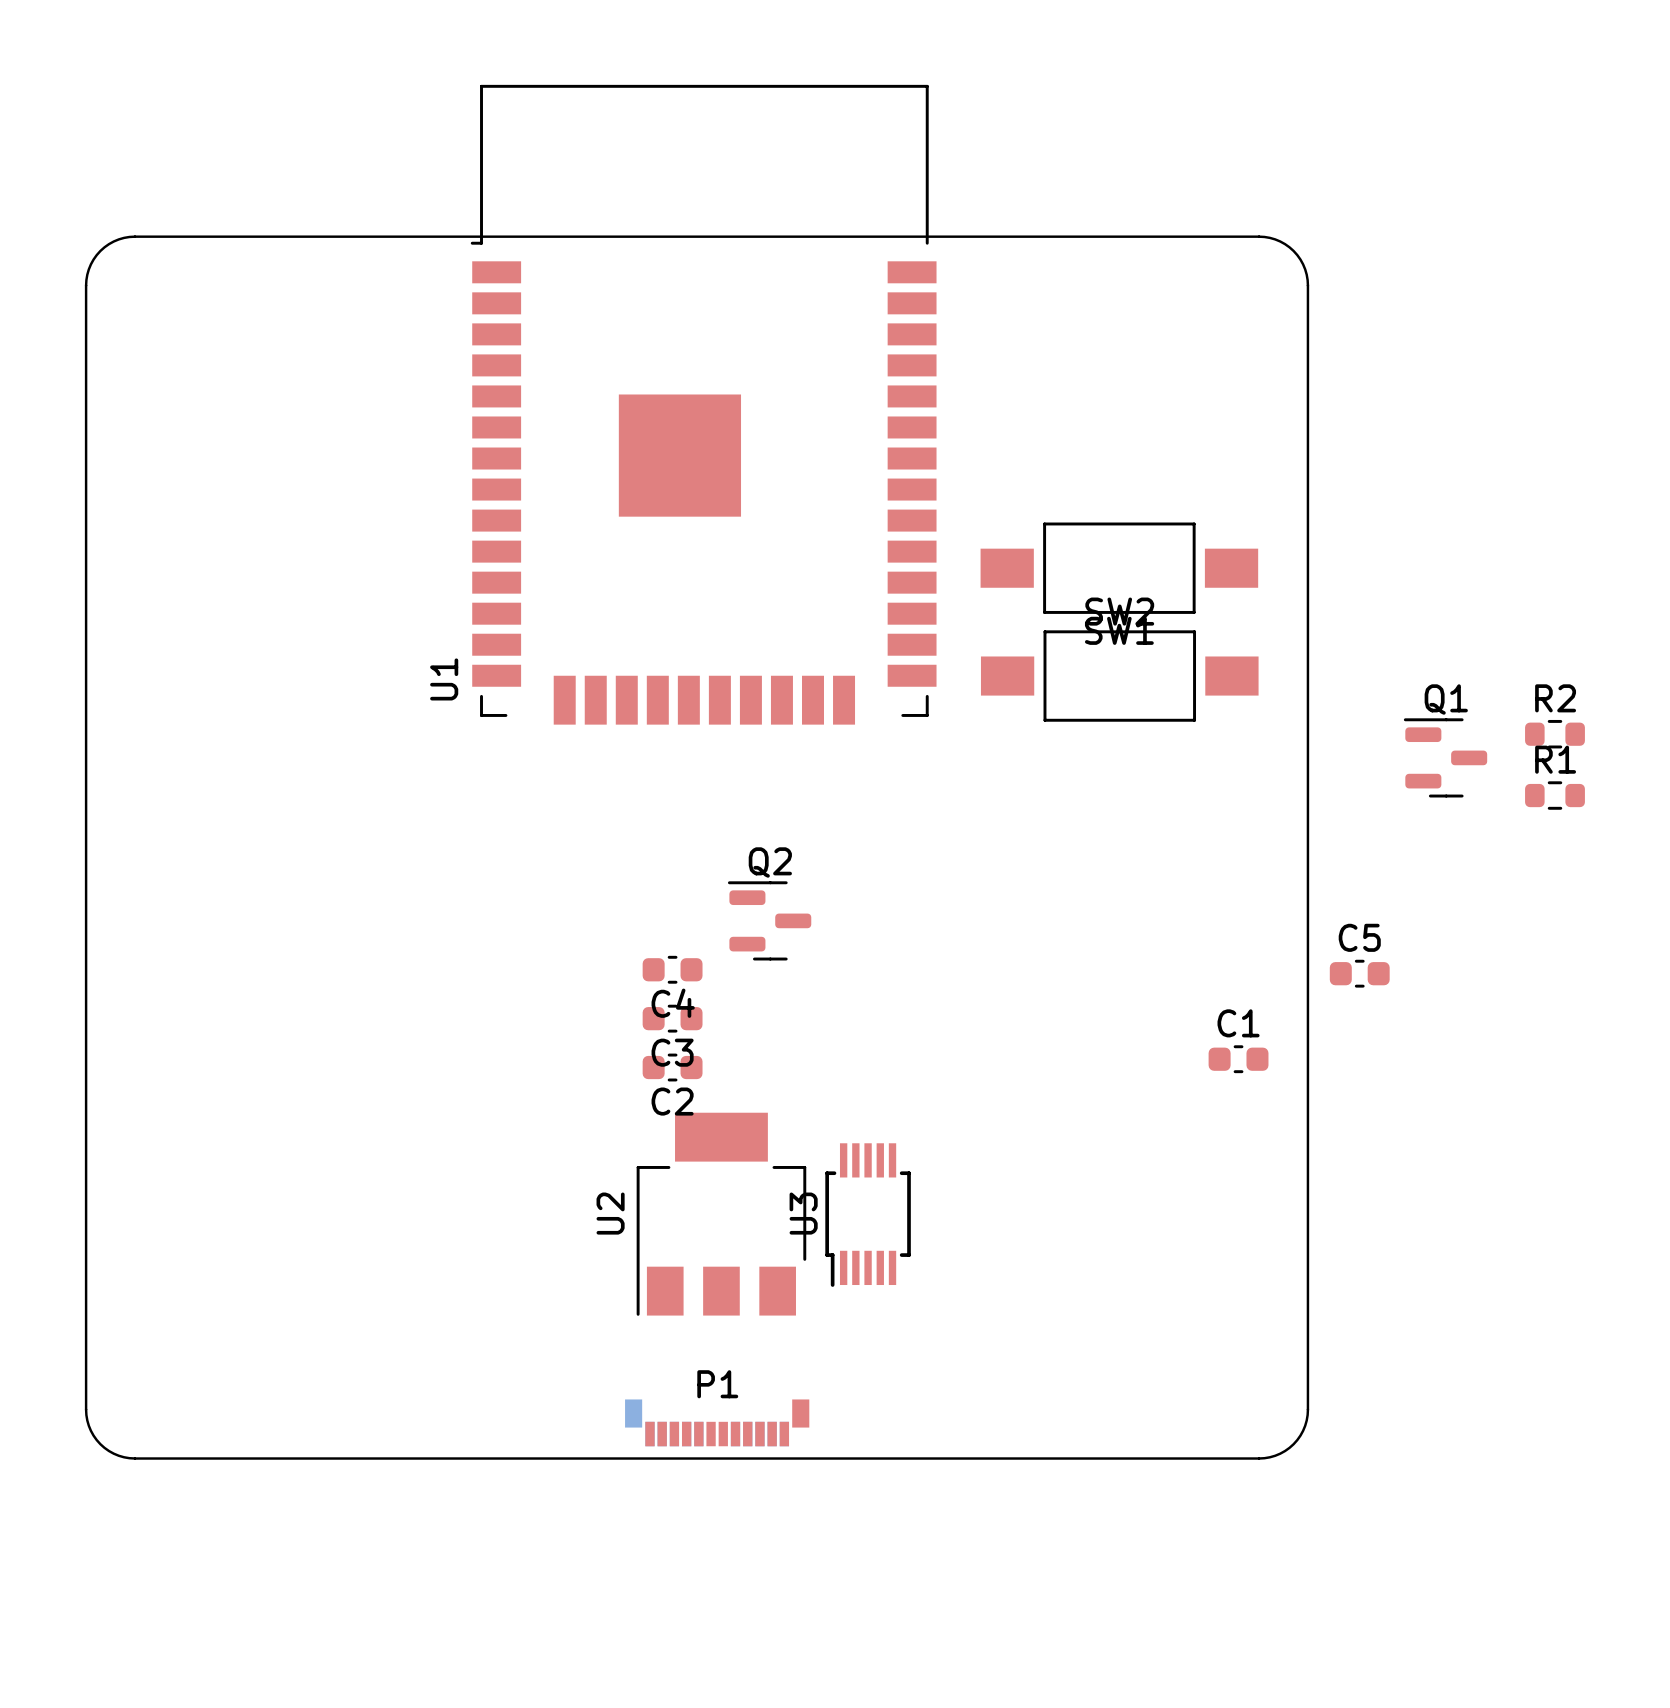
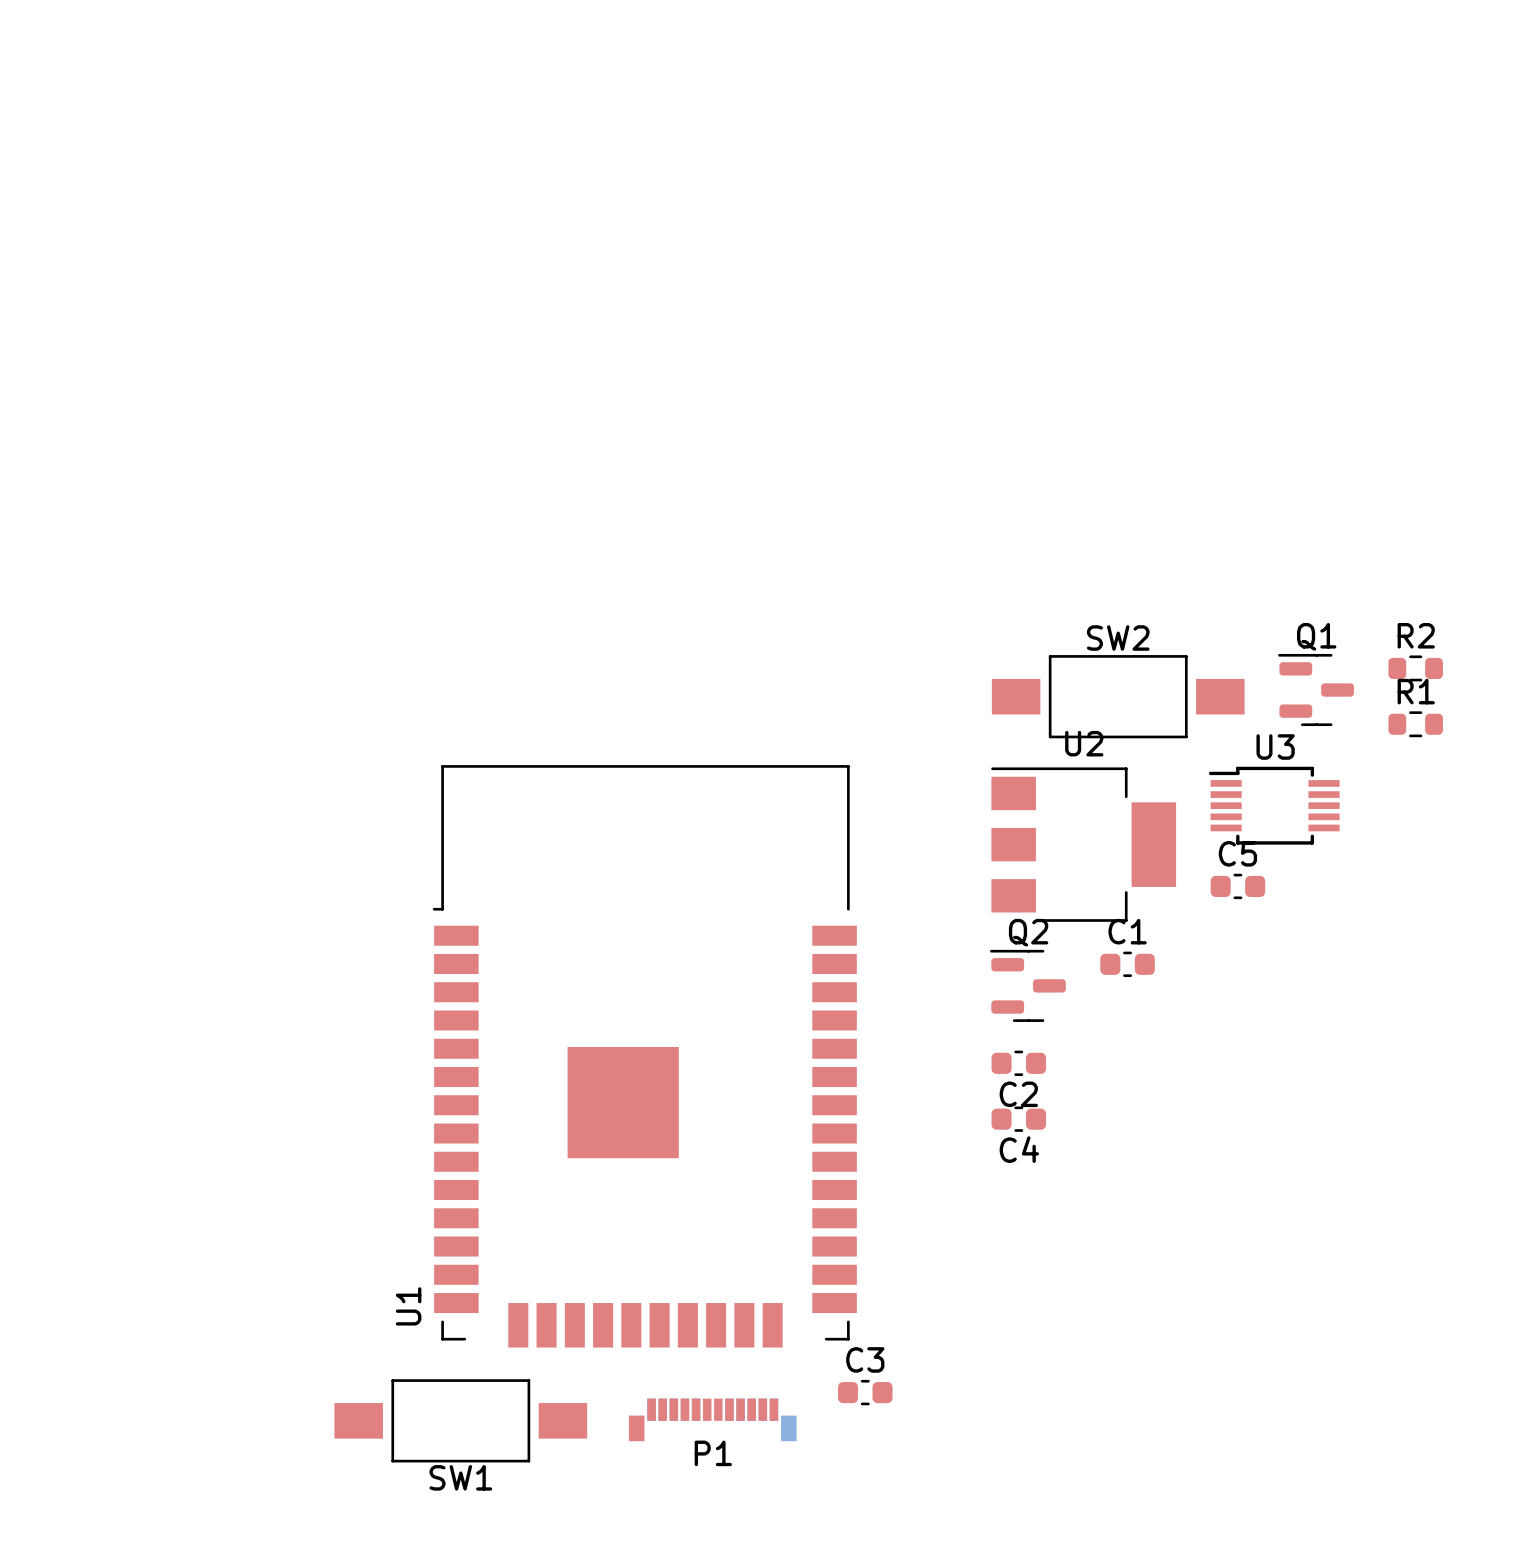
board edge: (134, 236) (1259, 236) (1280, 241) (1293, 250) (1303, 264) (1307, 285) (1307, 1409) (1305, 1425) (1293, 1444) (1275, 1455) (1259, 1458) (134, 1458) (118, 1455) (100, 1444) (88, 1425) (86, 1409) (86, 285) (90, 264) (100, 250) (113, 241) (134, 236) -> none
U1 position: (703, 404) -> (644, 1056)
SW1 position: (1119, 568) -> (460, 1420)
SW2 position: (1119, 676) -> (1118, 696)
Q2 position: (769, 920) -> (1027, 985)
C4 position: (672, 969) -> (1018, 1119)
C3 position: (672, 1018) -> (865, 1392)
C3 name position: C3 (672, 1052) -> C3 (865, 1359)
C2 position: (672, 1067) -> (1018, 1063)
U2 rotation: 0° (721, 1214) -> 90° clockwise (1083, 844)
U2 position: (721, 1214) -> (1083, 844)
U3 rotation: 0° (868, 1215) -> 90° clockwise (1274, 805)
U3 position: (868, 1215) -> (1274, 805)
P1 rotation: 0° (717, 1422) -> 180° (712, 1419)
P1 position: (717, 1422) -> (712, 1419)

